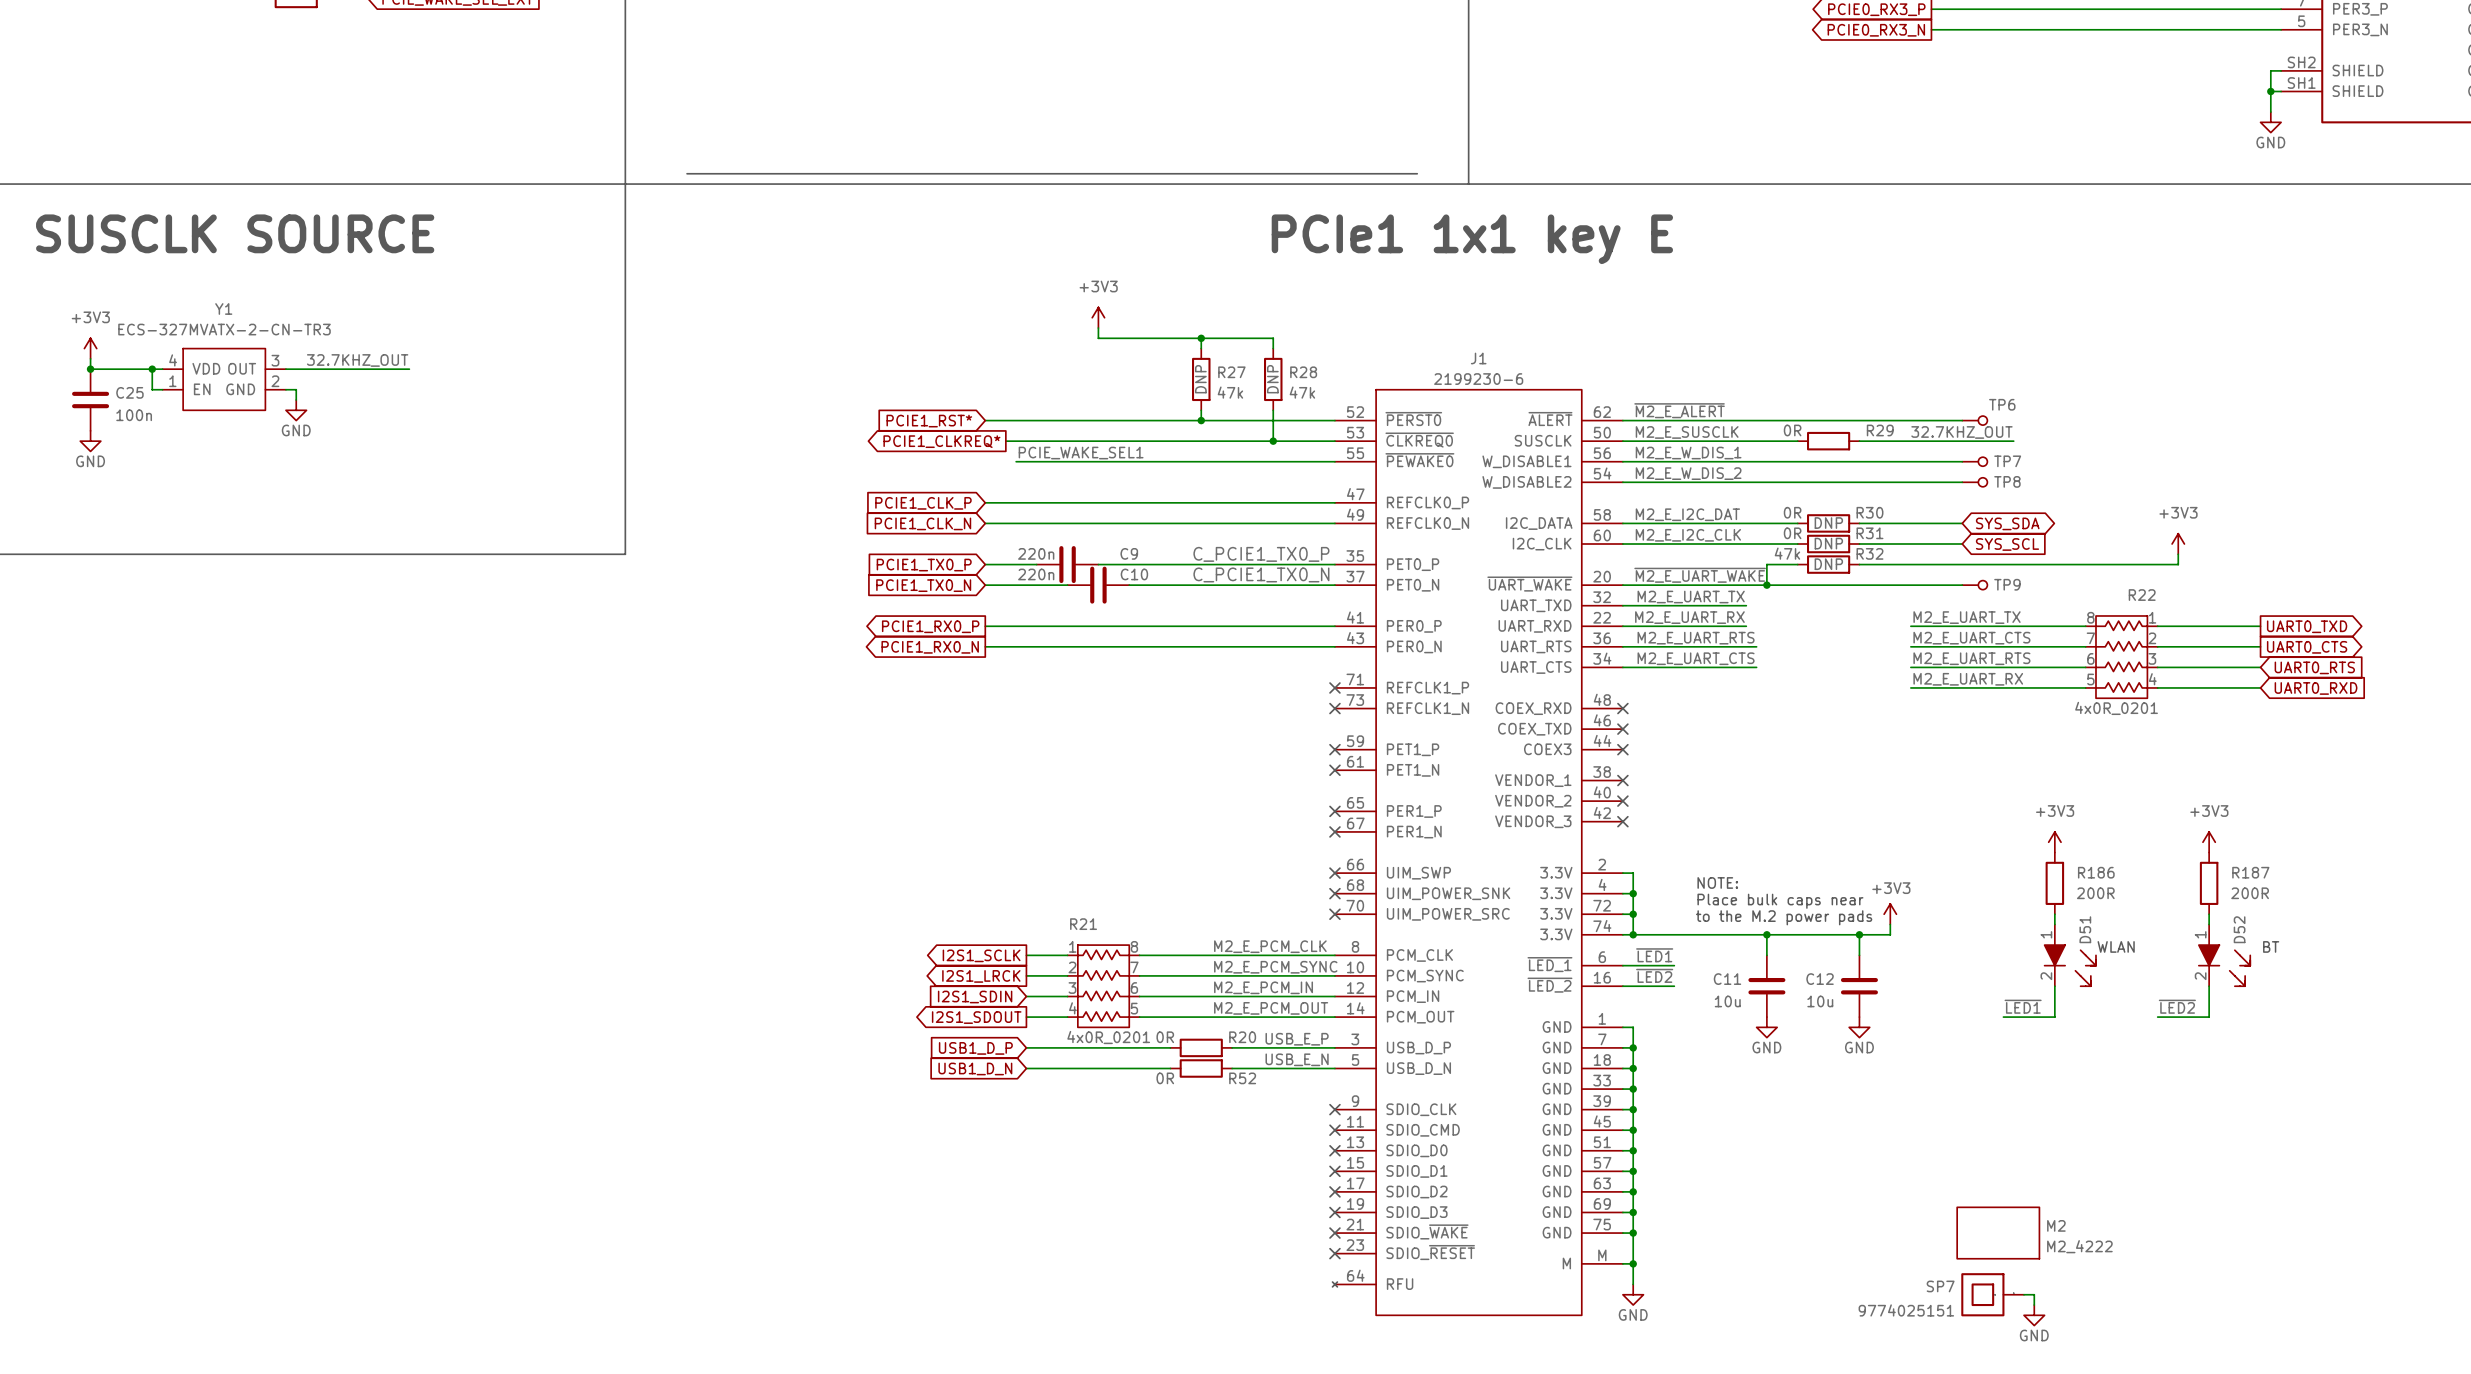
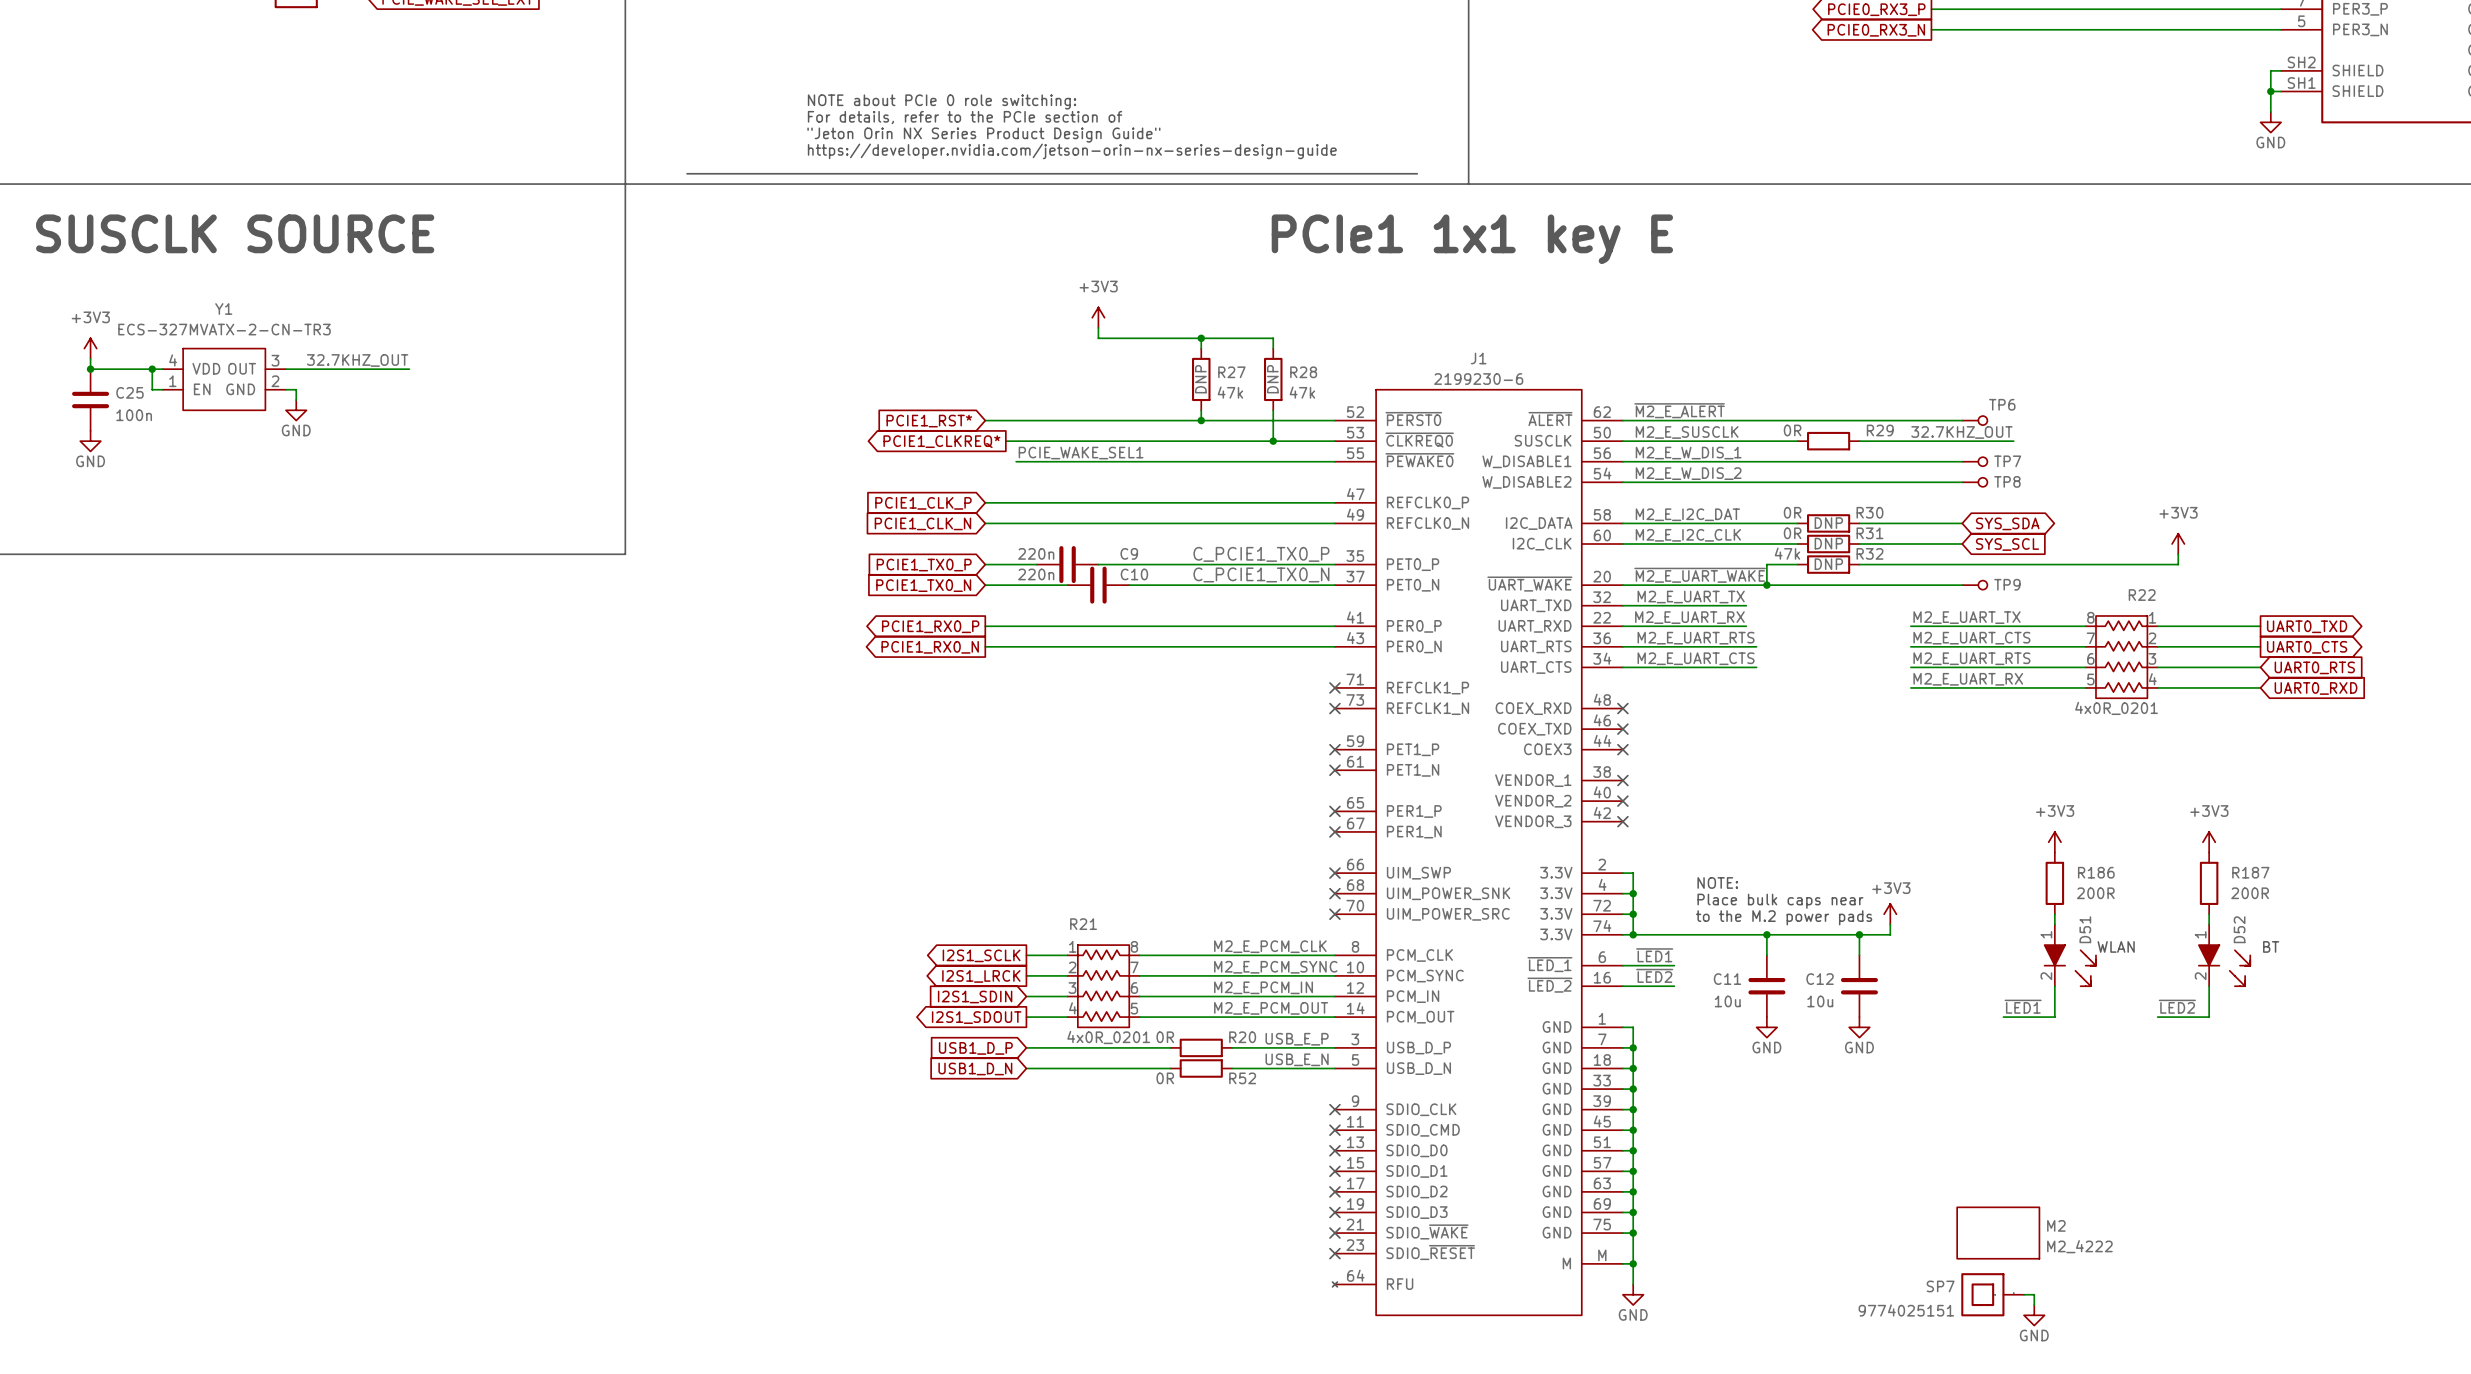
text: none -> NOTE about PCIe 0 role switching: (942, 101)
text: none -> For details, refer to the PCIe section of (965, 117)
text: none -> "Jeton Orin NX Series Product Design Guide" (983, 135)
text: none -> https://developer.nvidia.com/jetson-orin-nx-series-design-guide (1072, 151)

